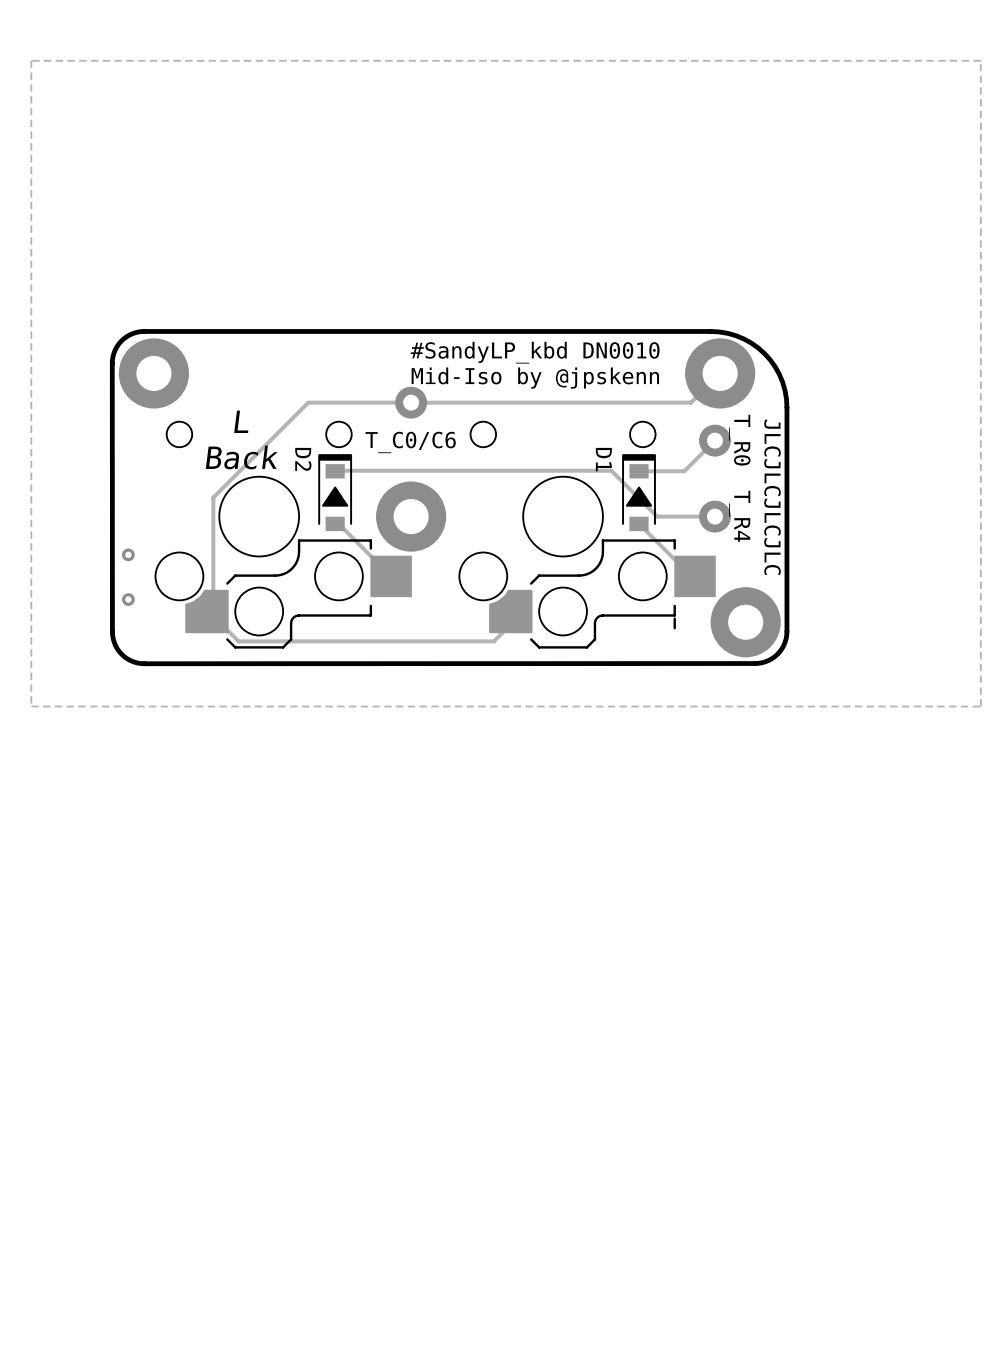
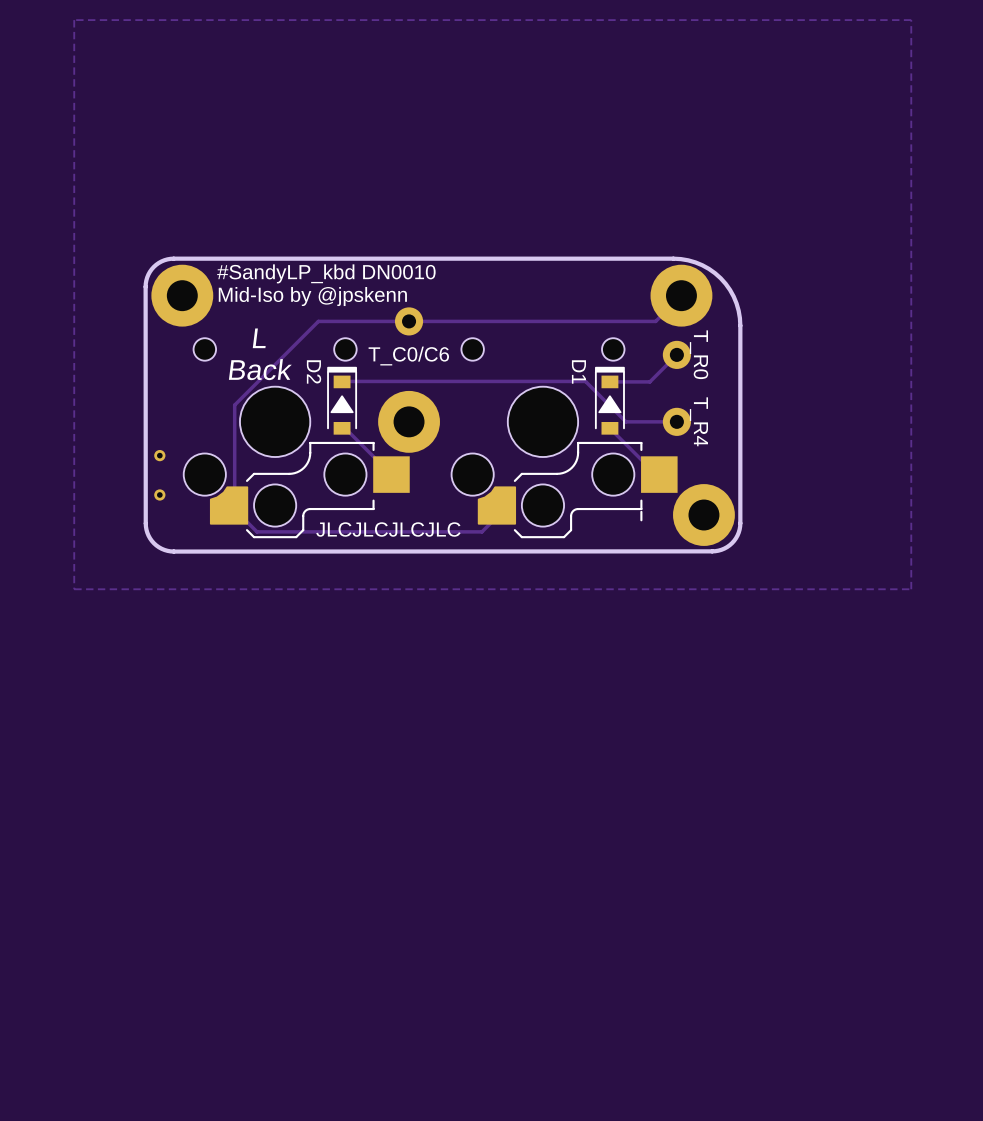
text position: #SandyLP_kbd DN0010 (535, 352) -> #SandyLP_kbd DN0010 (326, 273)
text position: Mid-Iso by @jpskenn (535, 378) -> Mid-Iso by @jpskenn (312, 296)
text: JLCJLCJLCJLC (772, 497) -> none
text: none -> JLCJLCJLCJLC (388, 529)

